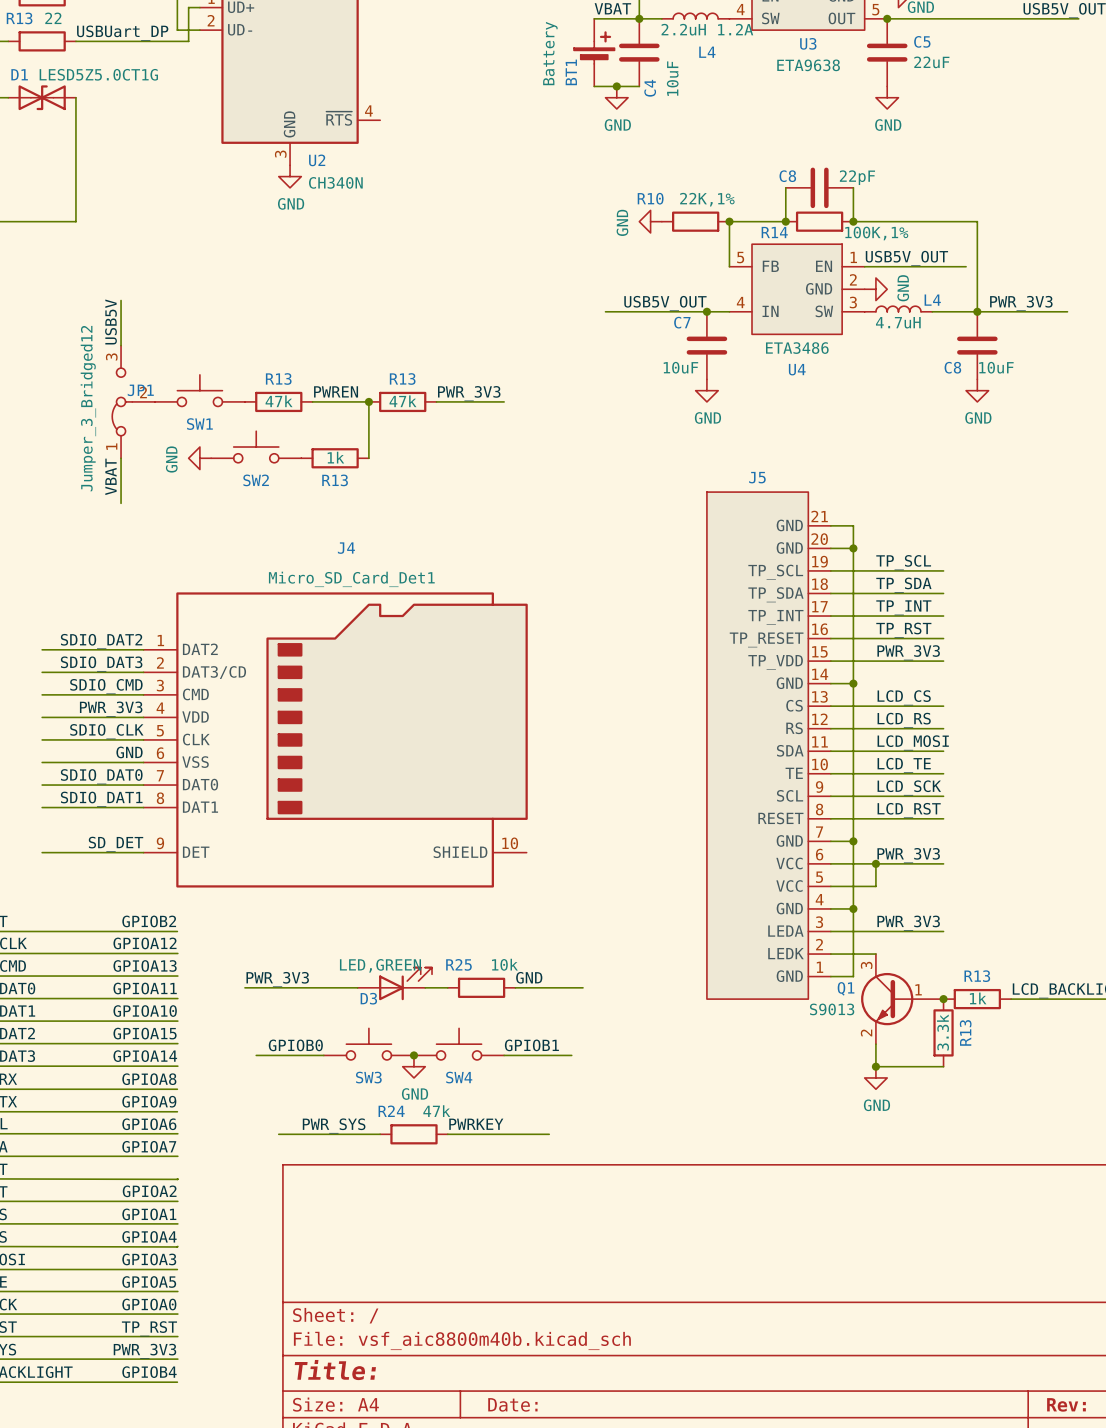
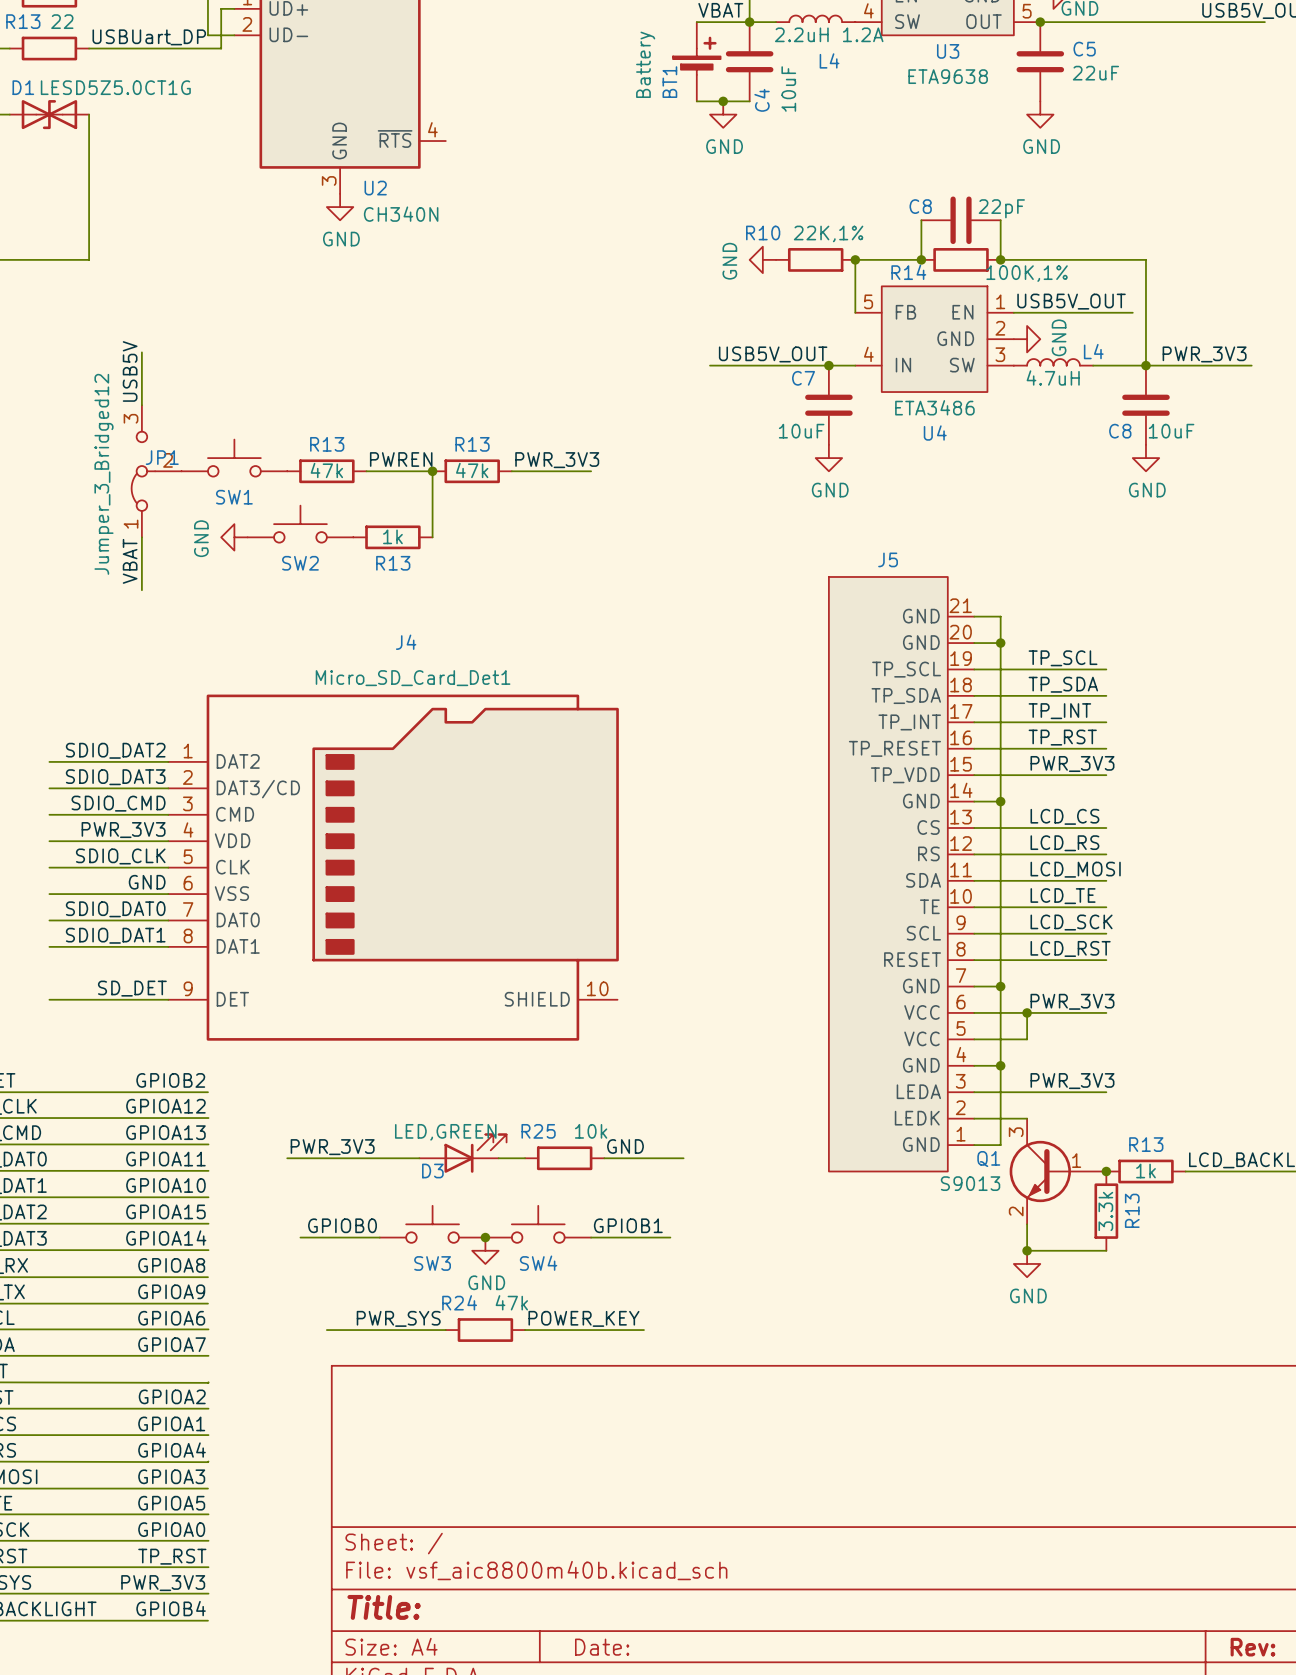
label: PWRKEY (476, 1124) -> POWER_KEY (583, 1318)

